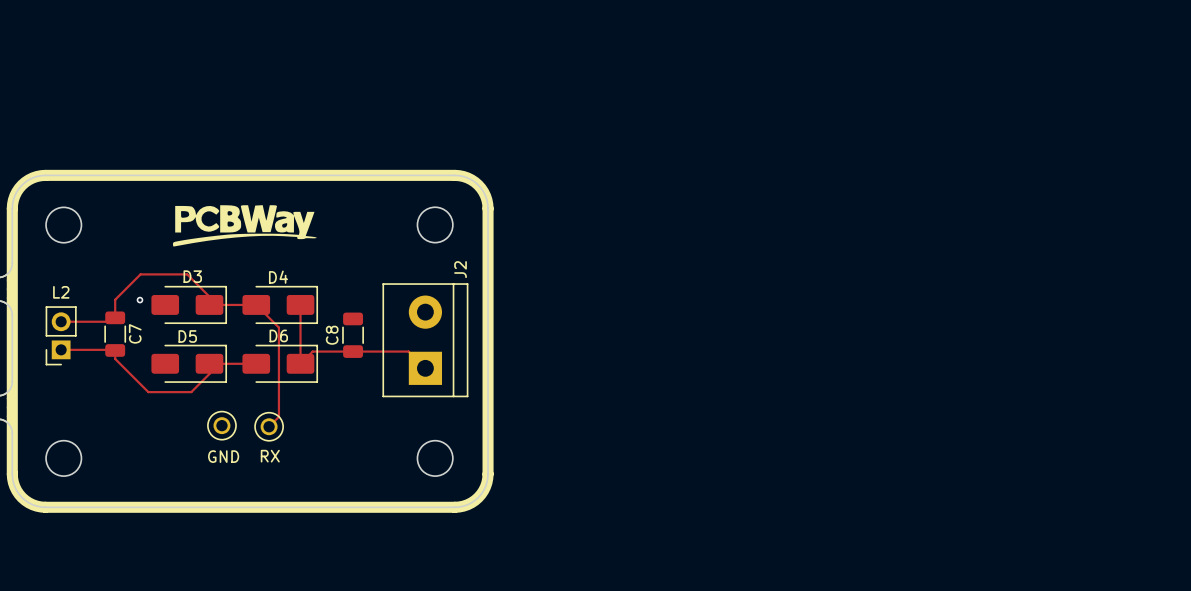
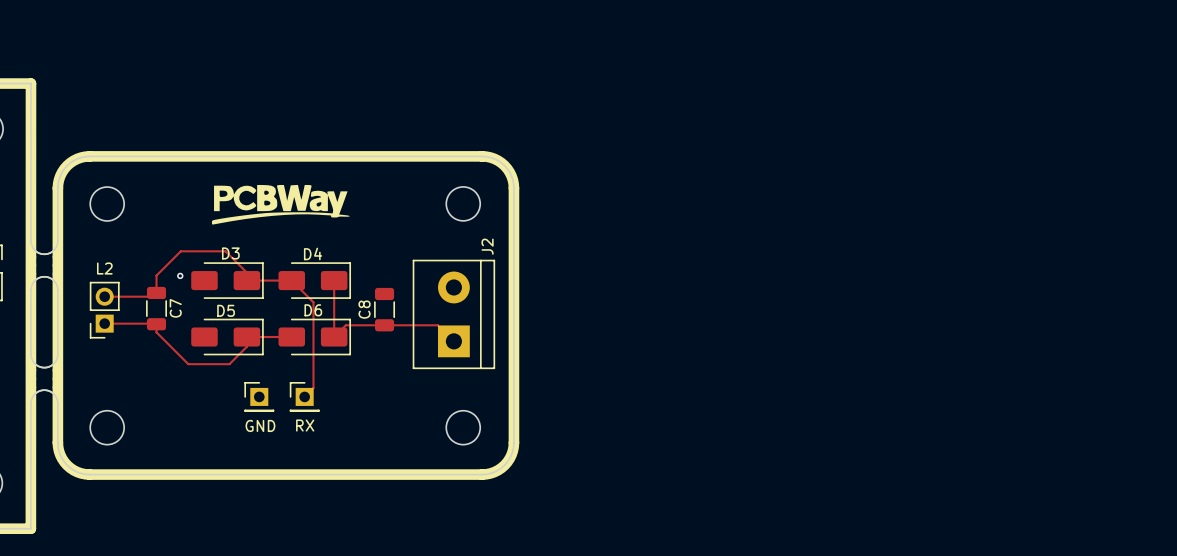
part footprint: [207, 410, 237, 441] -> [244, 382, 275, 412]
part footprint: [254, 411, 284, 442] -> [289, 382, 320, 412]

